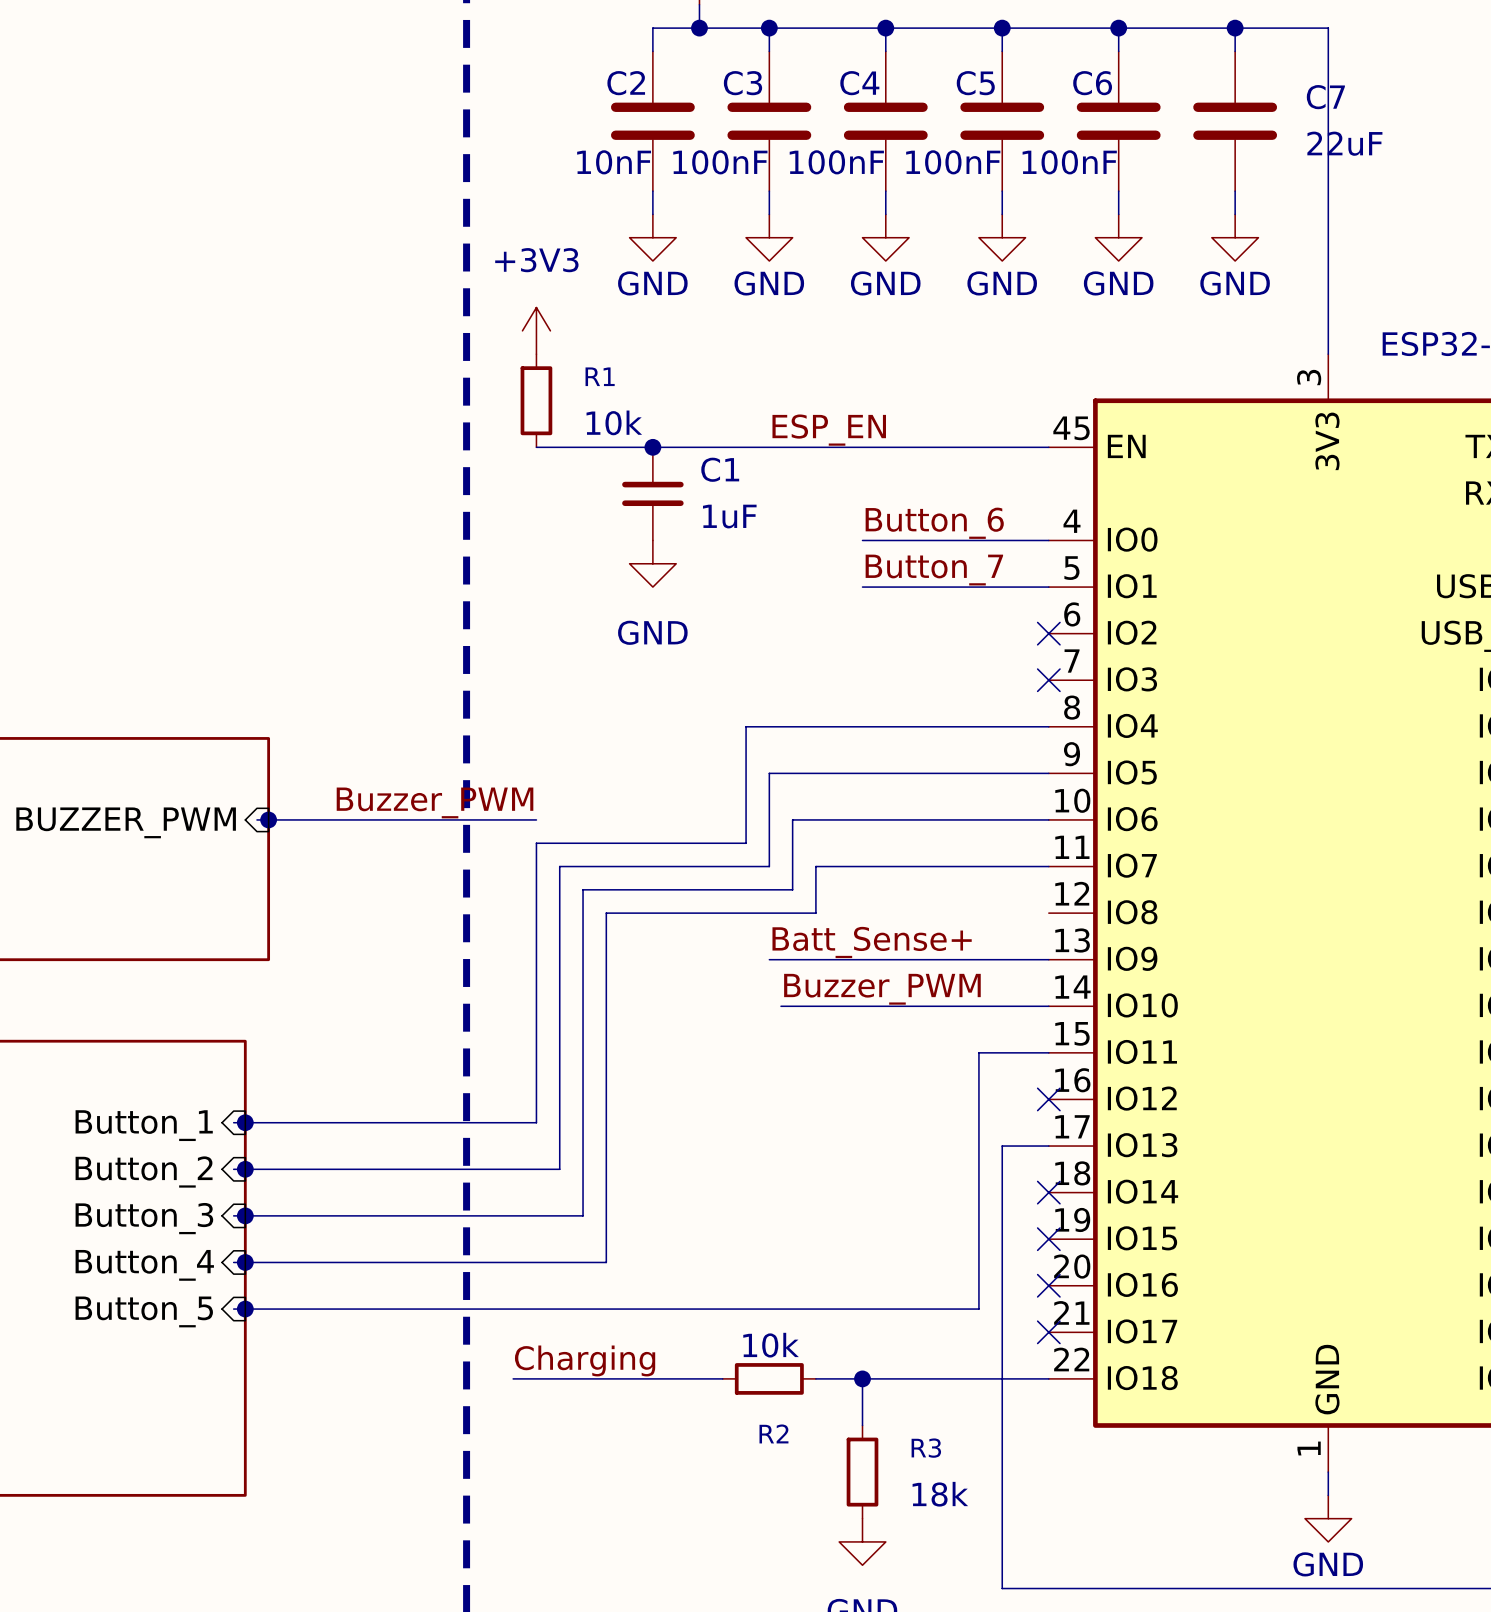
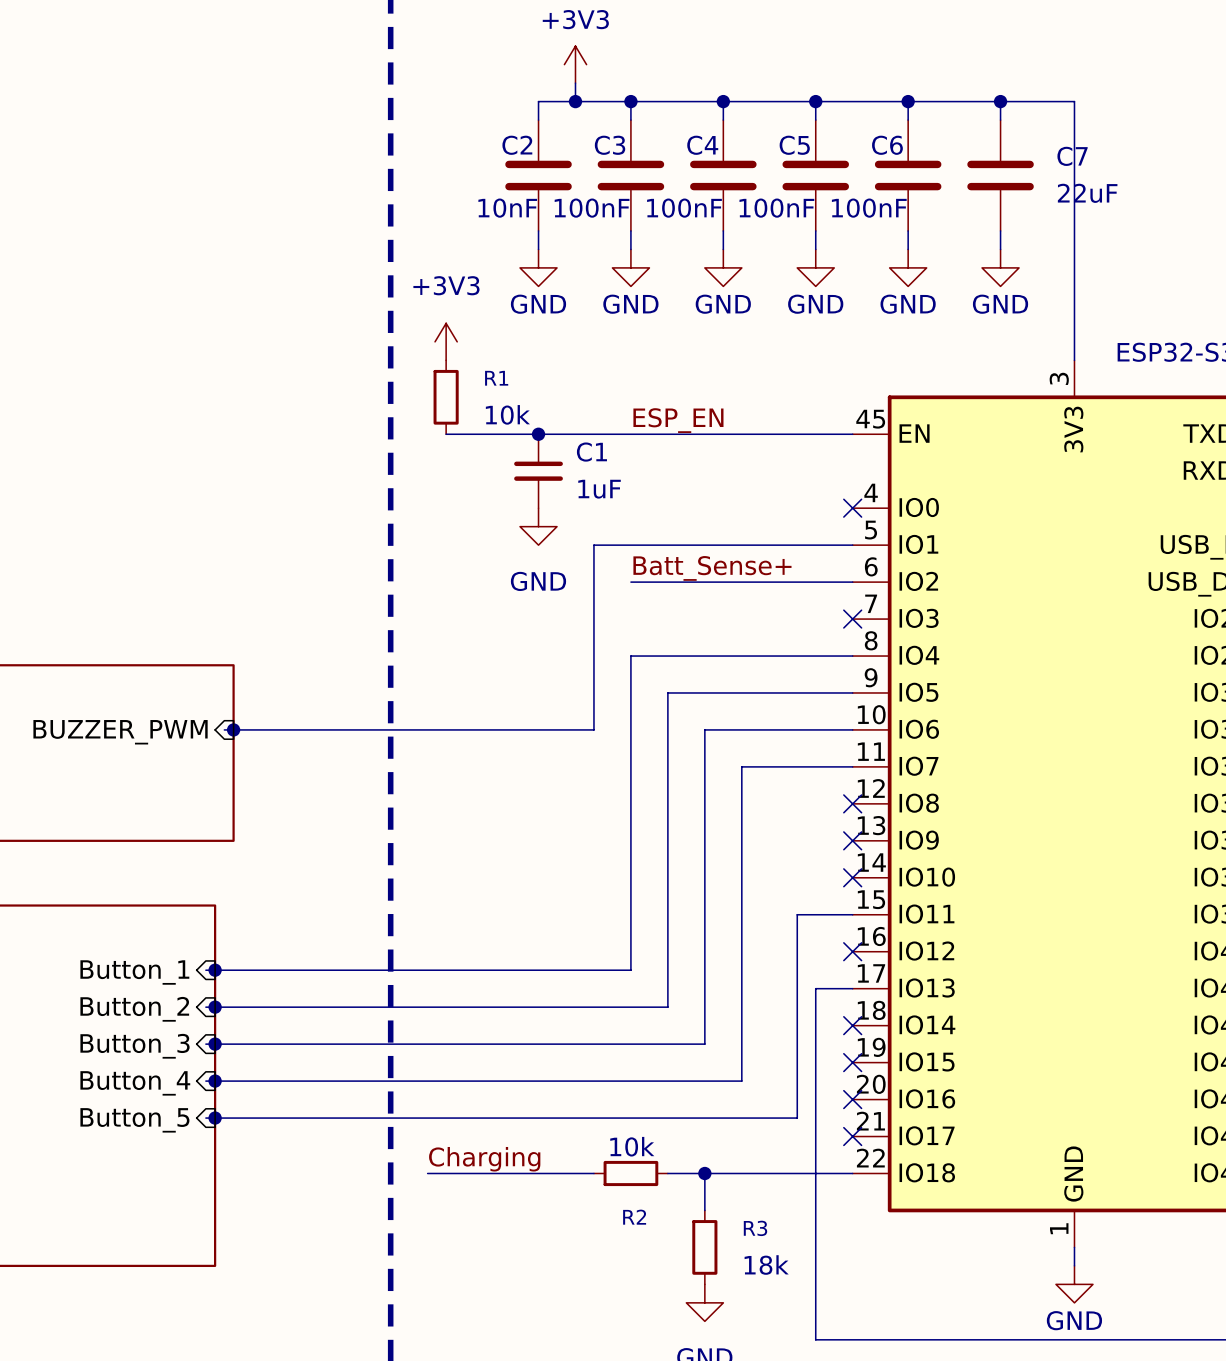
label: Button_6 (934, 523) -> none
wire: (862, 540) (1048, 540) -> none
label: Button_7 (934, 570) -> none
wire: none -> (704, 545) (593, 545) (593, 729) (446, 729)
no-connect mark position: (1048, 633) -> (852, 508)
wire: (769, 726) (746, 726) (746, 843) (536, 843) (536, 1122) -> none
wire: (769, 773) (815, 773) -> (630, 692) (630, 656)
label: Buzzer_PWM (435, 802) -> none
wire: (862, 819) (792, 819) (792, 889) (583, 889) (583, 1215) -> (704, 729) (704, 1044) (483, 1044)
wire: (769, 866) (559, 866) (559, 1169) -> (630, 766) (630, 970) (446, 970)
wire: (815, 866) (909, 866) -> (667, 766) (667, 692)
wire: (815, 913) (606, 913) (606, 1262) -> (741, 766) (741, 1081) (501, 1081)
wire: none -> (667, 803) (667, 1007) (464, 1007)
no-connect mark: none -> (852, 803)
label position: Batt_Sense+ (872, 942) -> Batt_Sense+ (712, 568)
wire: (769, 959) (1048, 959) -> (630, 582) (852, 582)
no-connect mark: none -> (852, 840)
label: Buzzer_PWM (882, 989) -> none
wire: (780, 1006) (1048, 1006) -> none
no-connect mark: none -> (852, 877)

